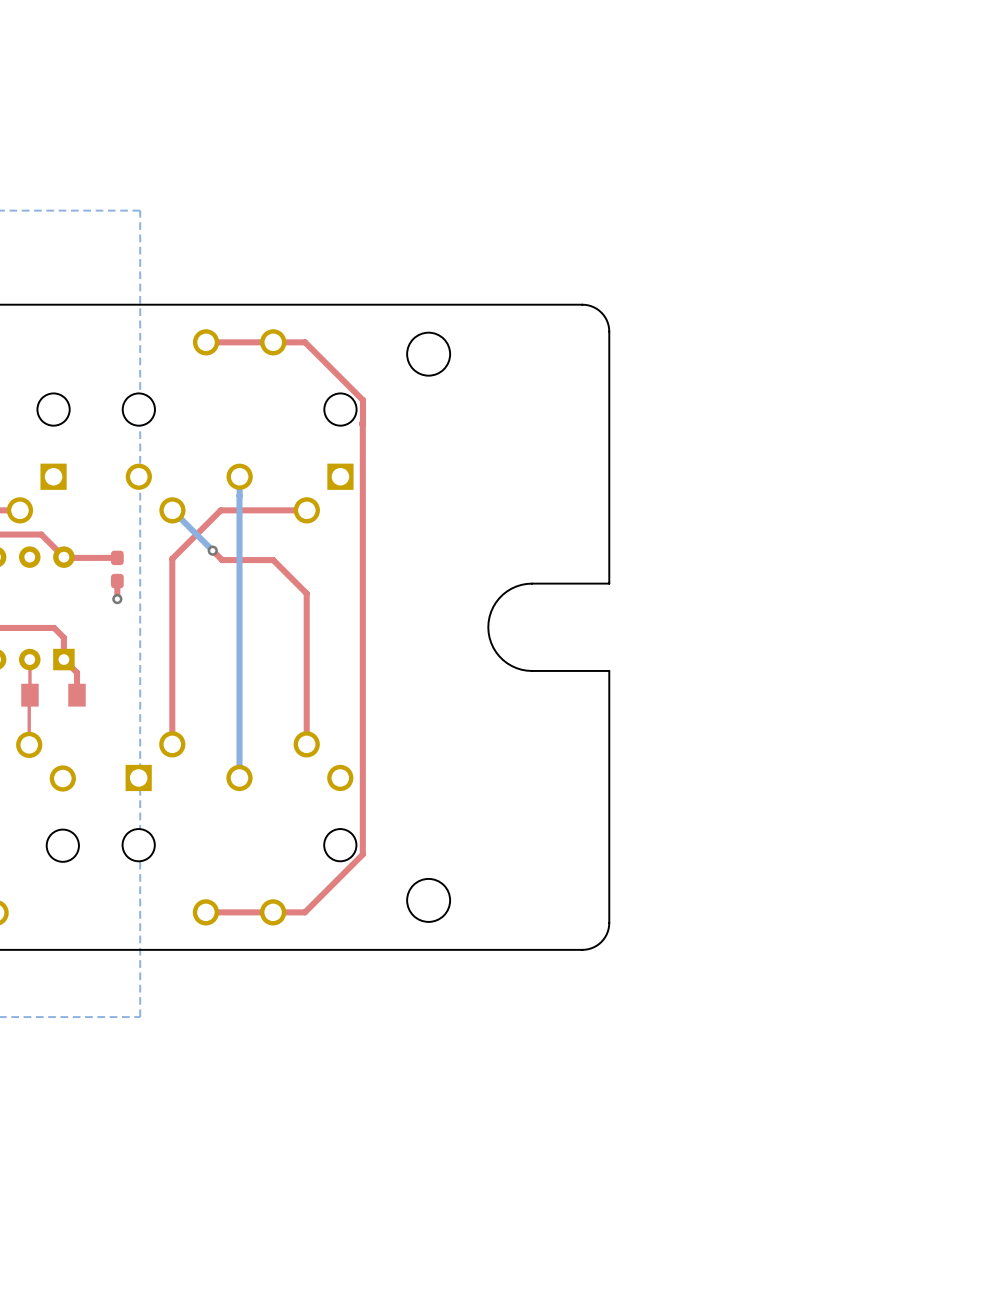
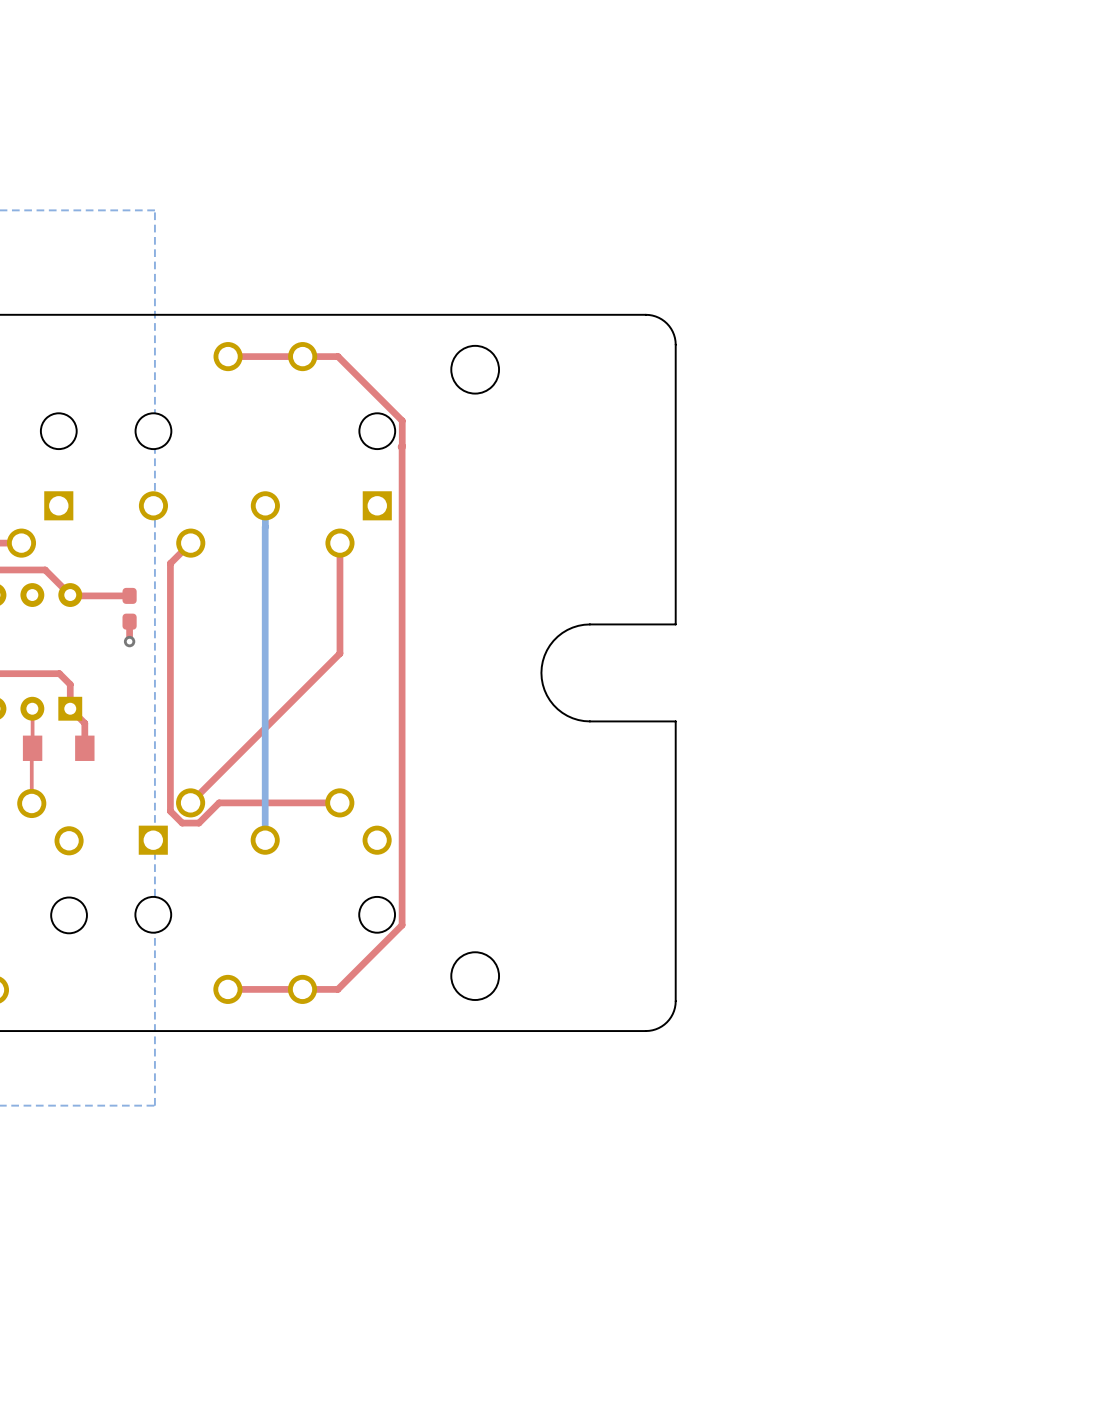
bottom track: (172, 510) (212, 550) -> none
top track: (306, 510) (220, 510) (172, 558) (172, 744) -> (339, 543) (339, 653) (190, 802)
top track: (212, 550) (222, 560) (273, 560) (306, 593) (306, 744) -> (190, 543) (170, 563) (170, 811) (182, 823) (198, 823) (219, 802) (339, 802)
via: (212, 550) -> none

